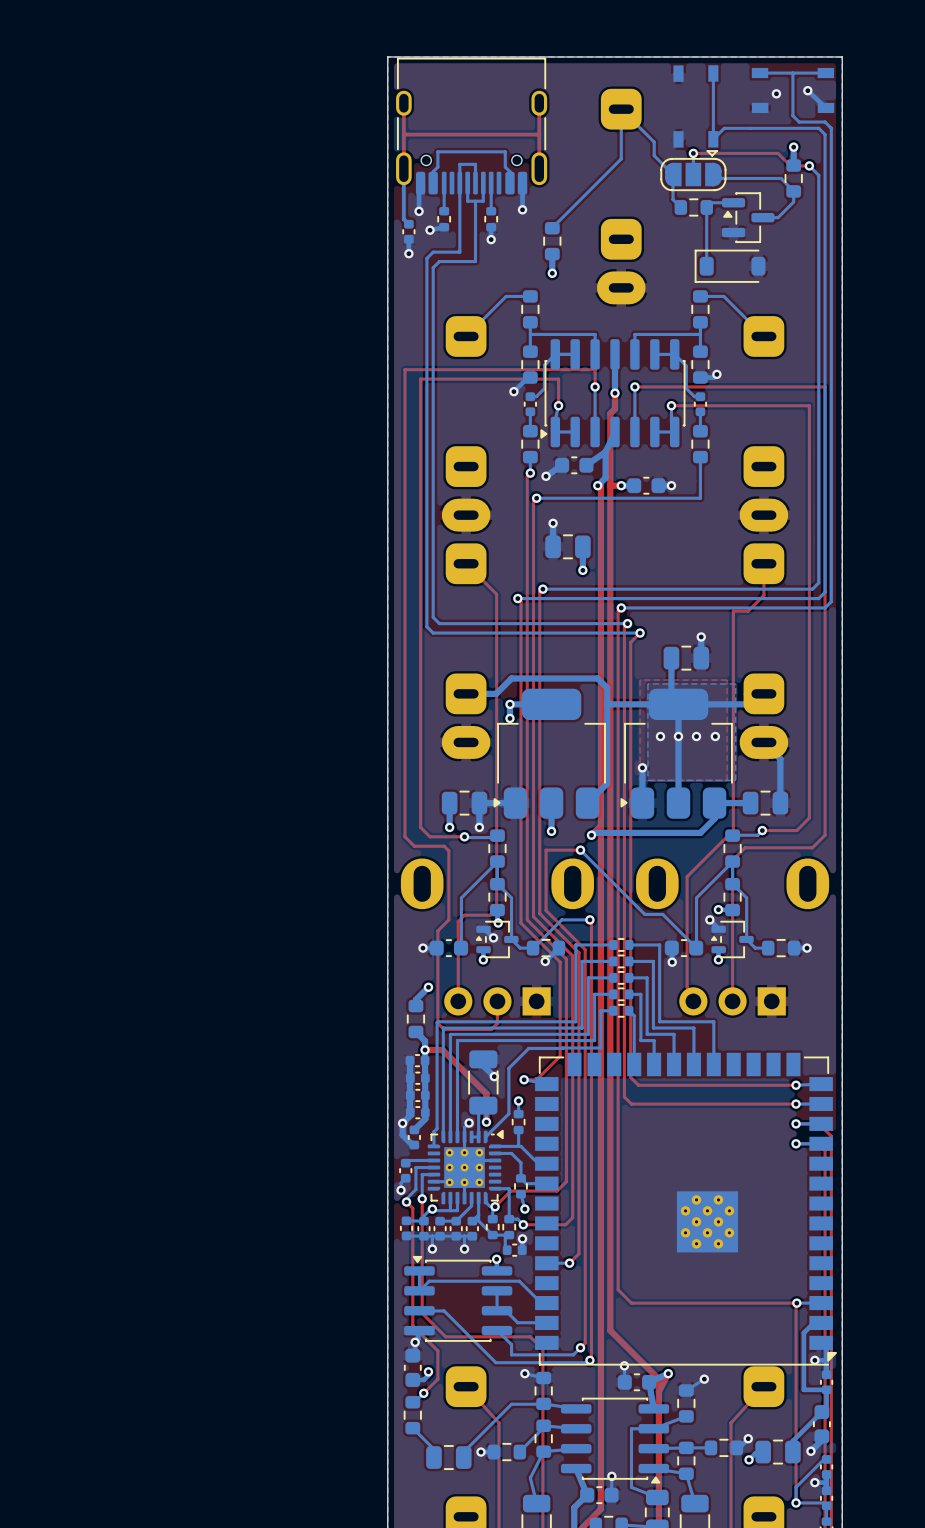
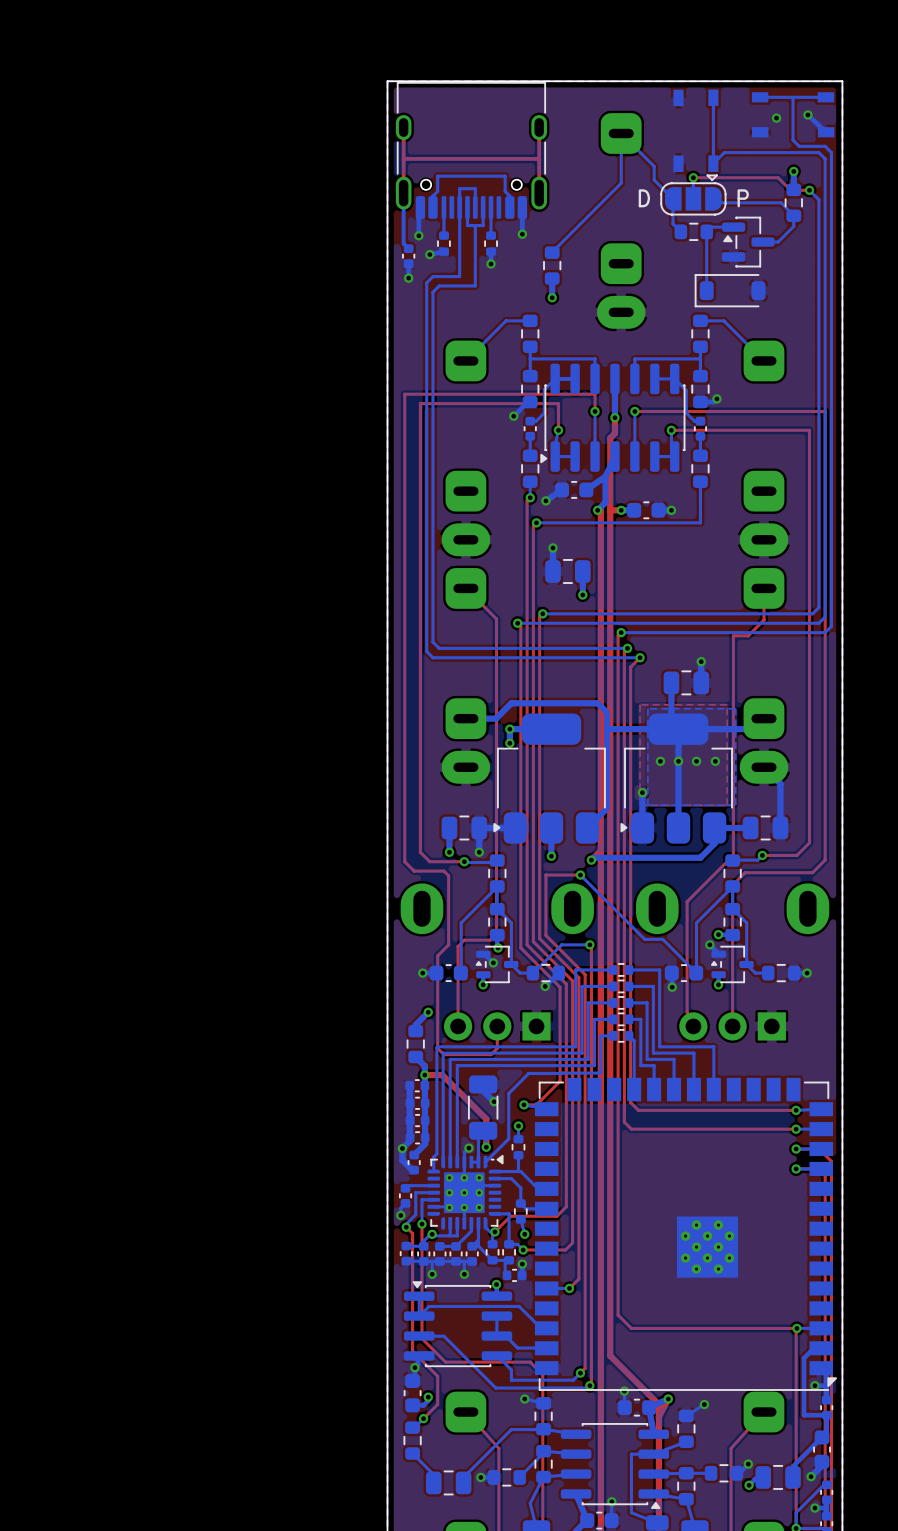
text: none -> D (644, 198)
text: none -> P (743, 198)

